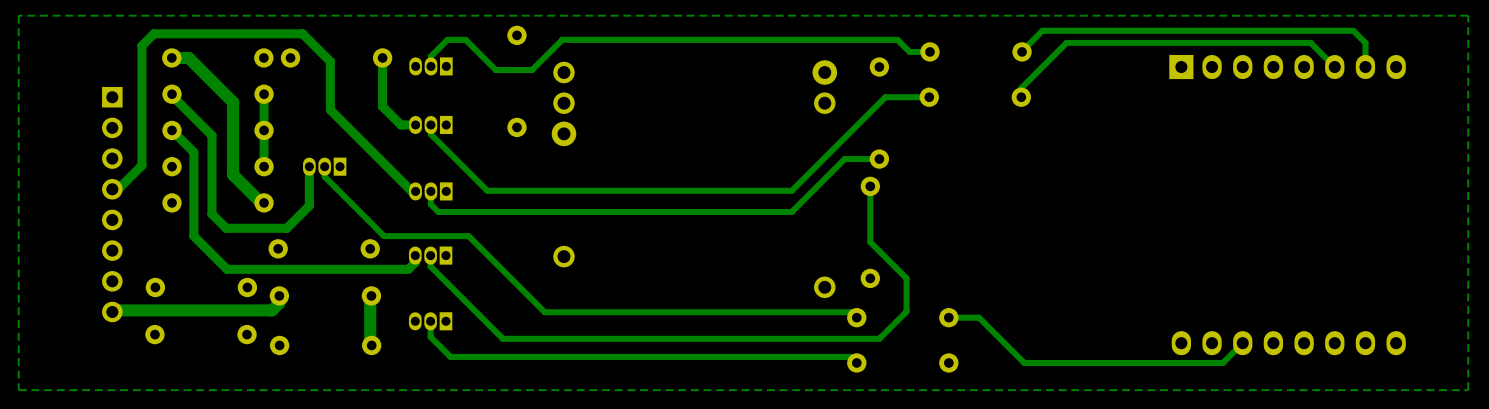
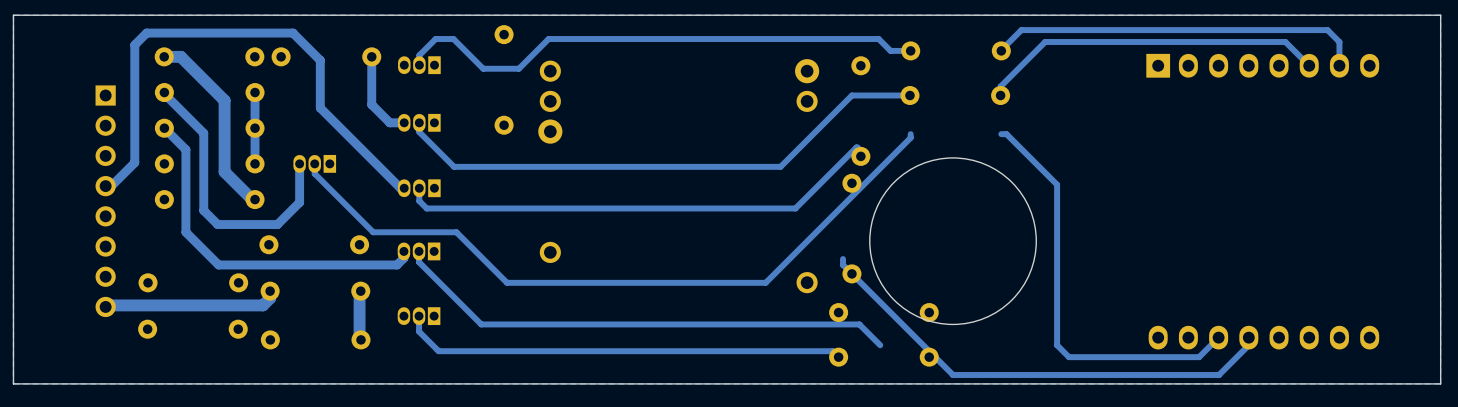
board edge: none -> (1440, 15) (13, 15) (13, 383) (1440, 383) (1440, 15)
track: (885, 97) (791, 190) (487, 190) (466, 169) -> (866, 95) (851, 95) (780, 166) (454, 166)
track: (879, 159) (844, 159) (791, 211) -> (857, 147) (795, 208) (774, 208)
round board edge: none -> [869, 157, 1037, 326]
track: (870, 186) (870, 242) (906, 278) (906, 311) (879, 338) (502, 338) (493, 329) -> (880, 345) (859, 324) (481, 324)
track: none -> (843, 259) (843, 264) (953, 374) (1219, 374) (1254, 337)
track: (520, 287) (544, 312) (851, 312) (856, 317) -> (507, 282) (765, 282) (910, 137) (910, 134)
track: (948, 317) (979, 317) (1024, 362) (1090, 362) -> (1001, 134) (1006, 134) (1057, 184) (1057, 345) (1068, 357)

